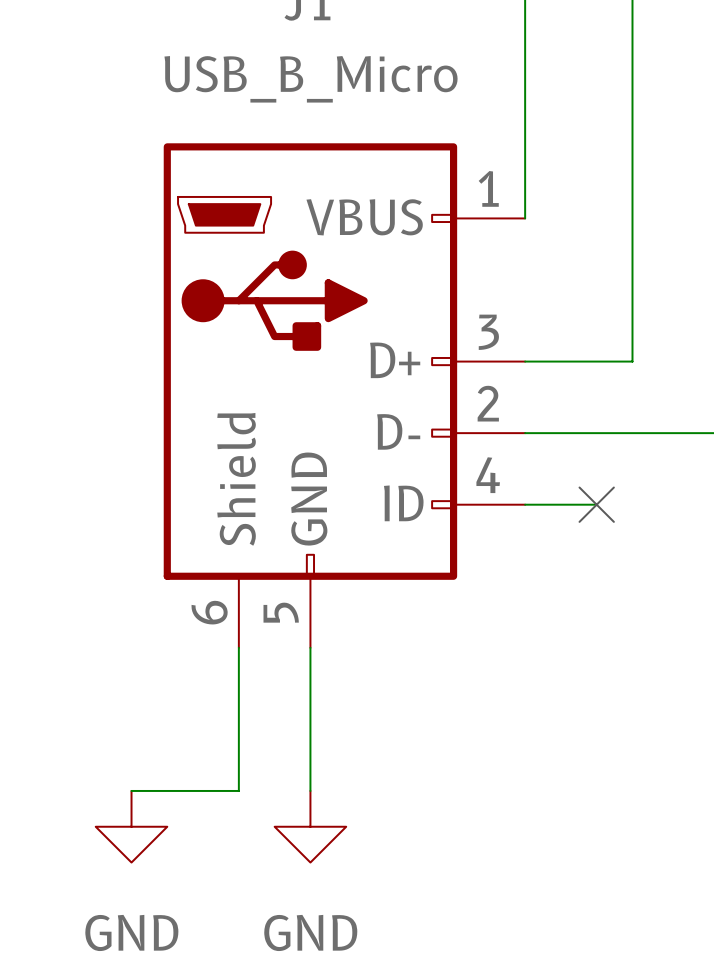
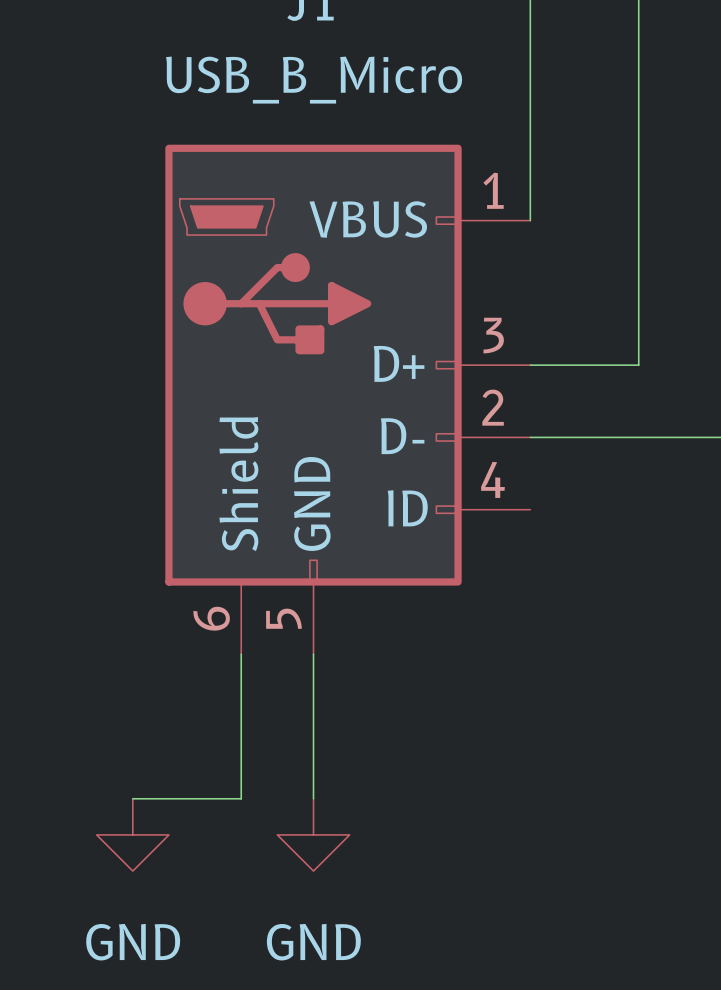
wire: (525, 504) (596, 504) -> none
no-connect mark: (596, 504) -> none

